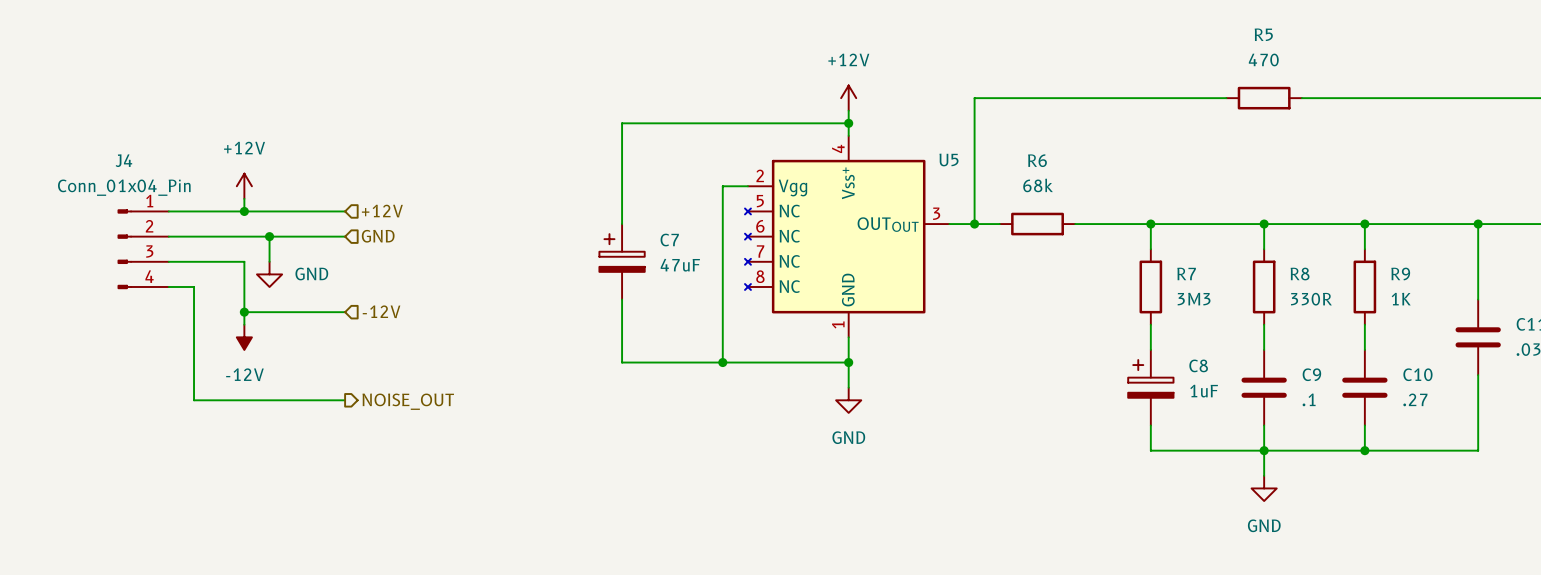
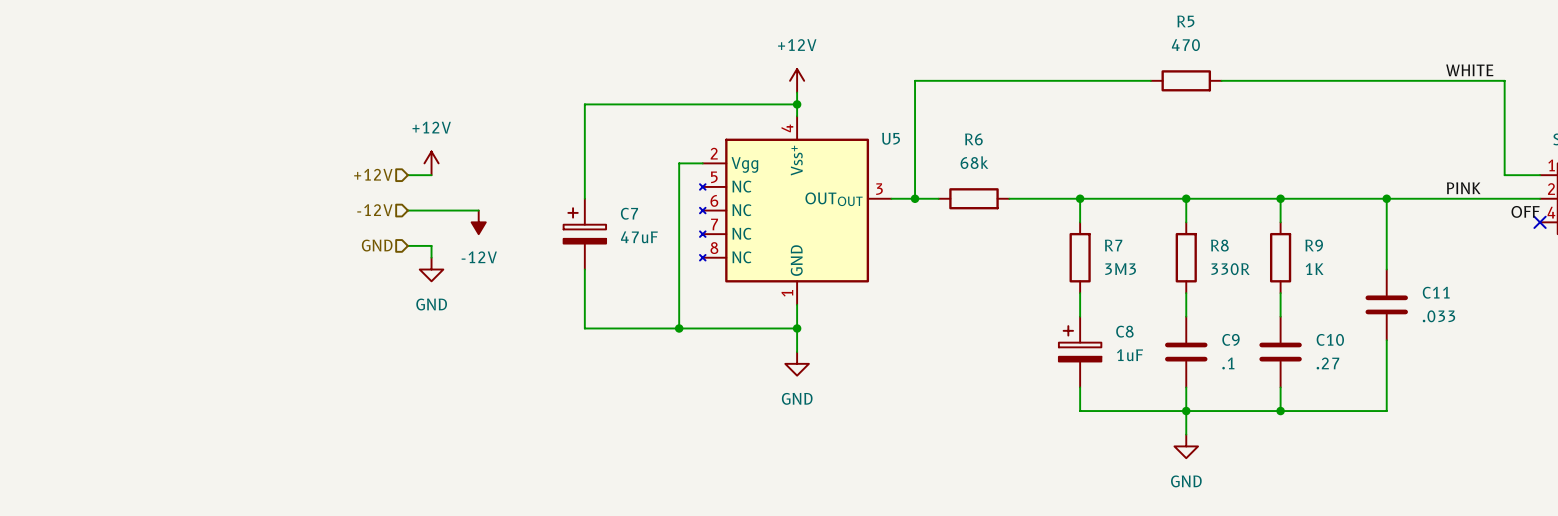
power symbol position: +12V (244, 186) -> +12V (431, 163)
wire: (244, 198) (244, 211) -> none
wire: none -> (407, 175) (431, 175)
wire: (168, 211) (345, 211) -> none
junction: (244, 211) -> none
hierarchical label rotation: 0° (382, 211) -> 180° (373, 174)
wire: (168, 236) (345, 236) -> none
wire: (269, 236) (269, 261) -> none
junction: (269, 236) -> none
hierarchical label rotation: 0° (378, 236) -> 180° (377, 245)
wire: none -> (407, 210) (478, 210)
J4: Conn_01x04_Pin (143, 249) -> none
power symbol: none -> -12V (478, 222)
wire: (168, 261) (244, 261) (244, 324) -> none
power symbol position: GND (269, 274) -> GND (431, 269)
power symbol text position: GND (311, 274) -> GND (431, 304)
wire: none -> (407, 245) (431, 245) (431, 257)
wire: (168, 286) (194, 286) (194, 400) (345, 400) -> none
hierarchical label rotation: 0° (381, 311) -> 180° (374, 210)
hierarchical label position: -12V (381, 311) -> -12V (374, 210)
wire: (244, 312) (345, 312) -> none
junction: (244, 312) -> none
power symbol: -12V (244, 337) -> none
hierarchical label: NOISE_OUT (408, 401) -> none

